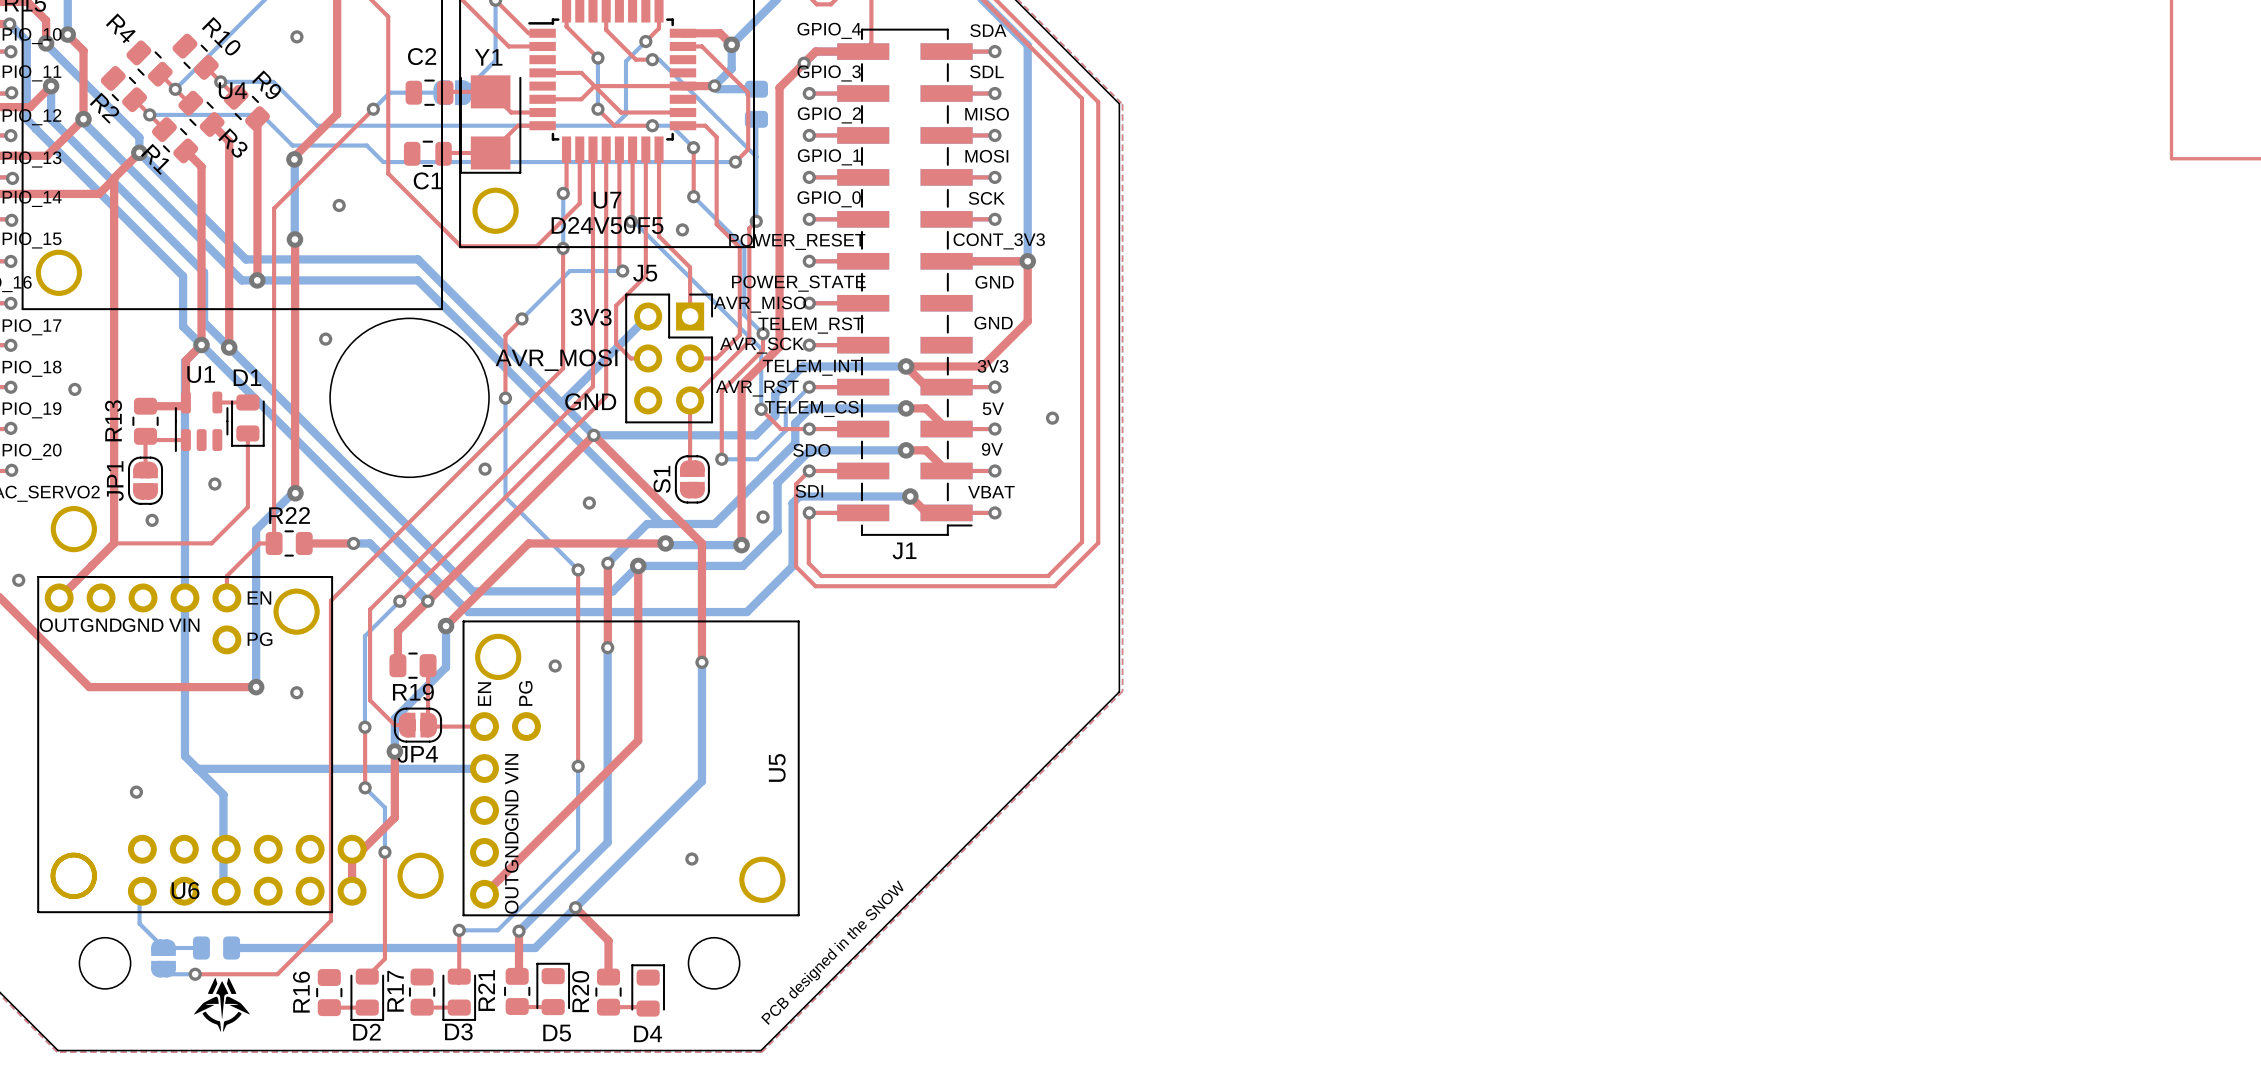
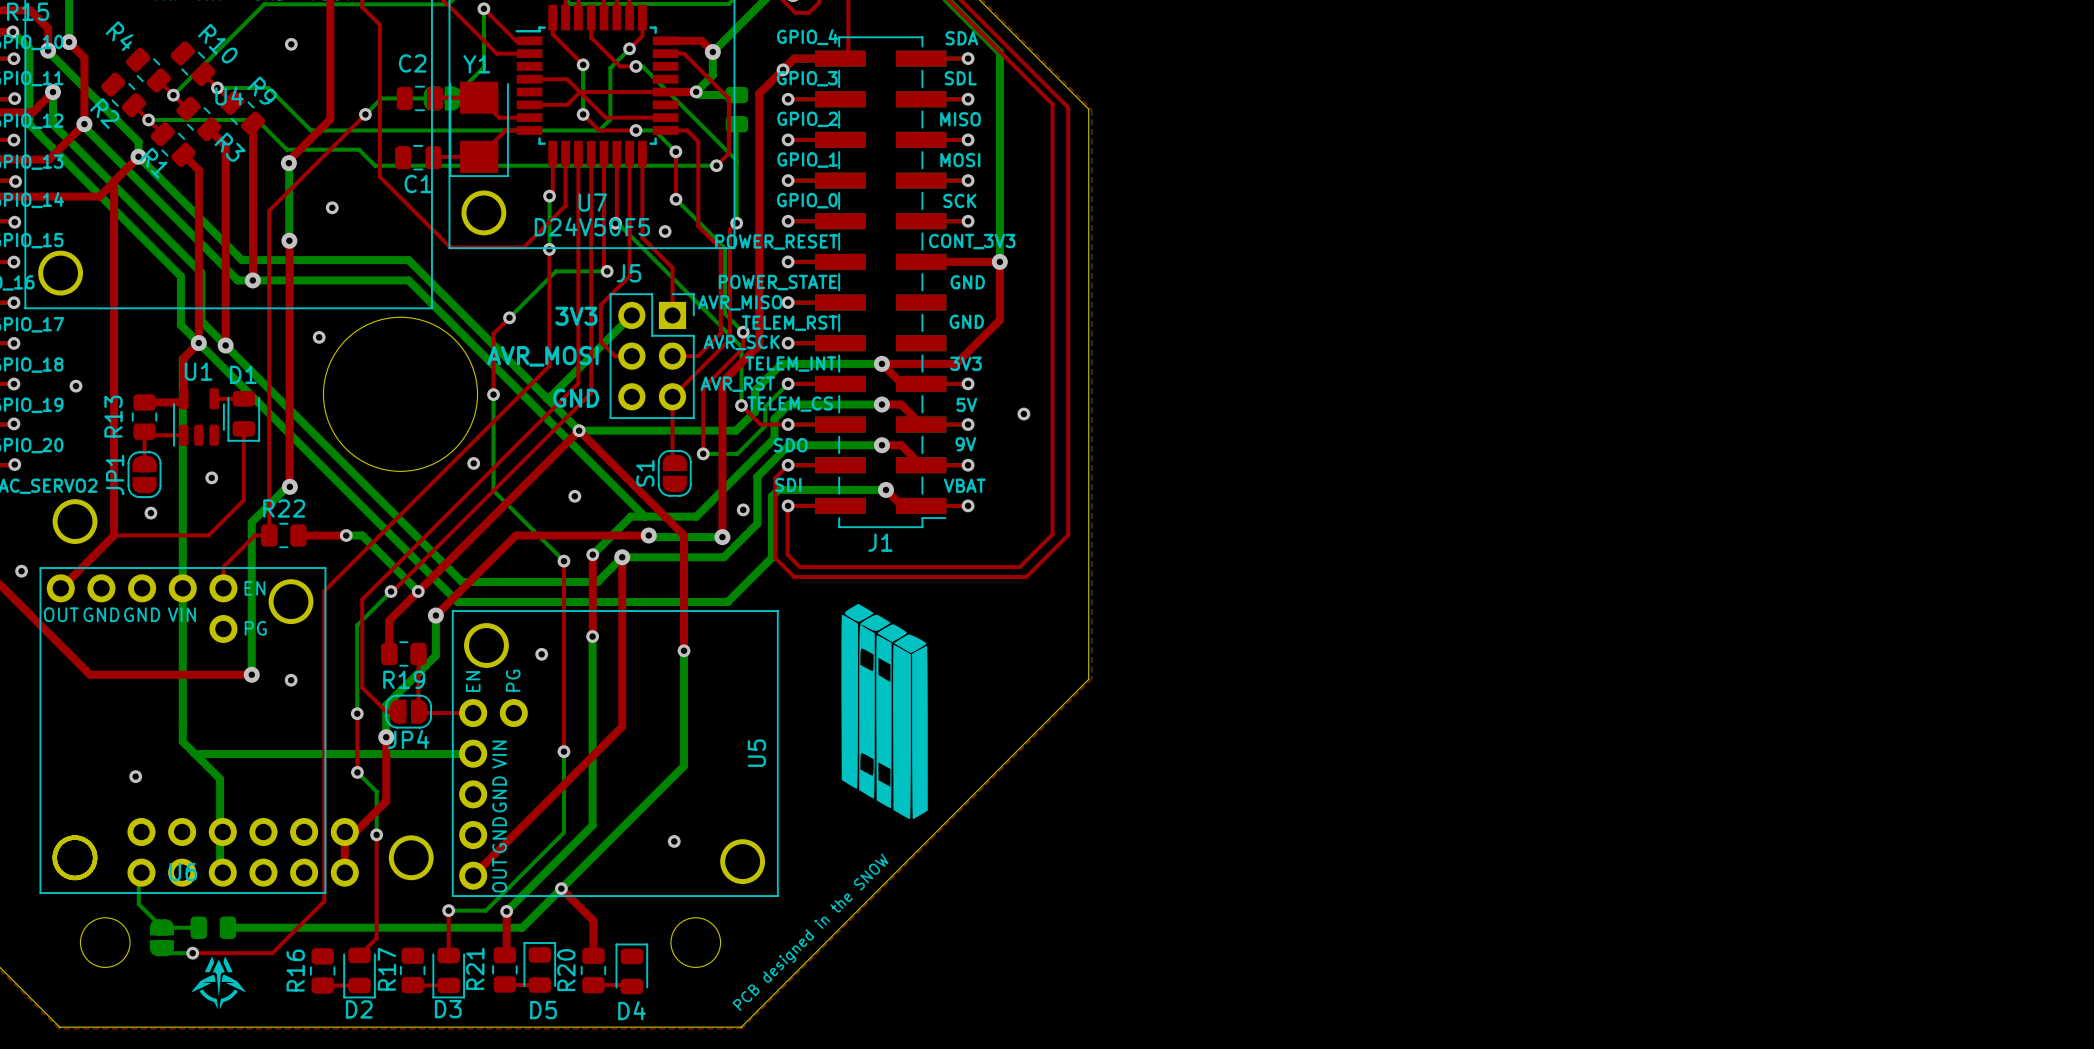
drawing: none -> [841, 603, 928, 820]

